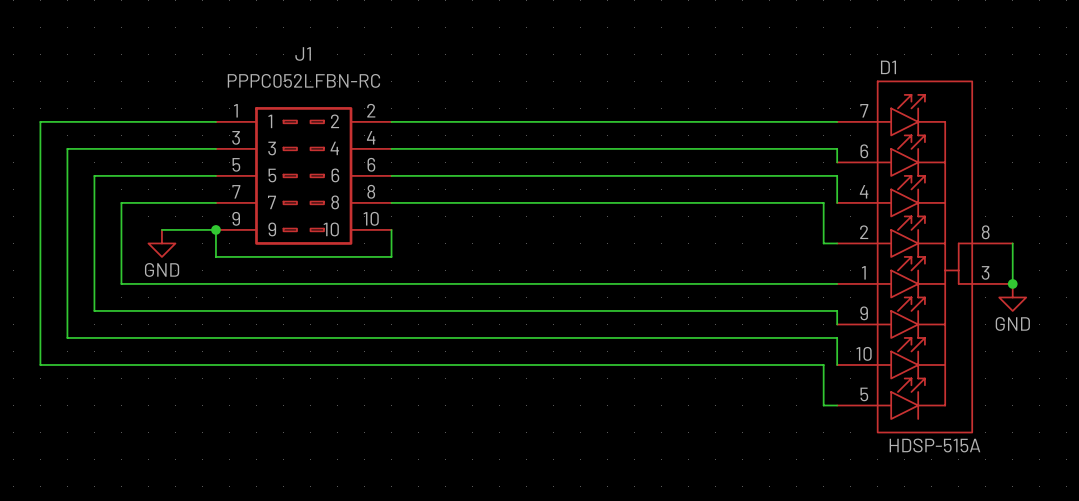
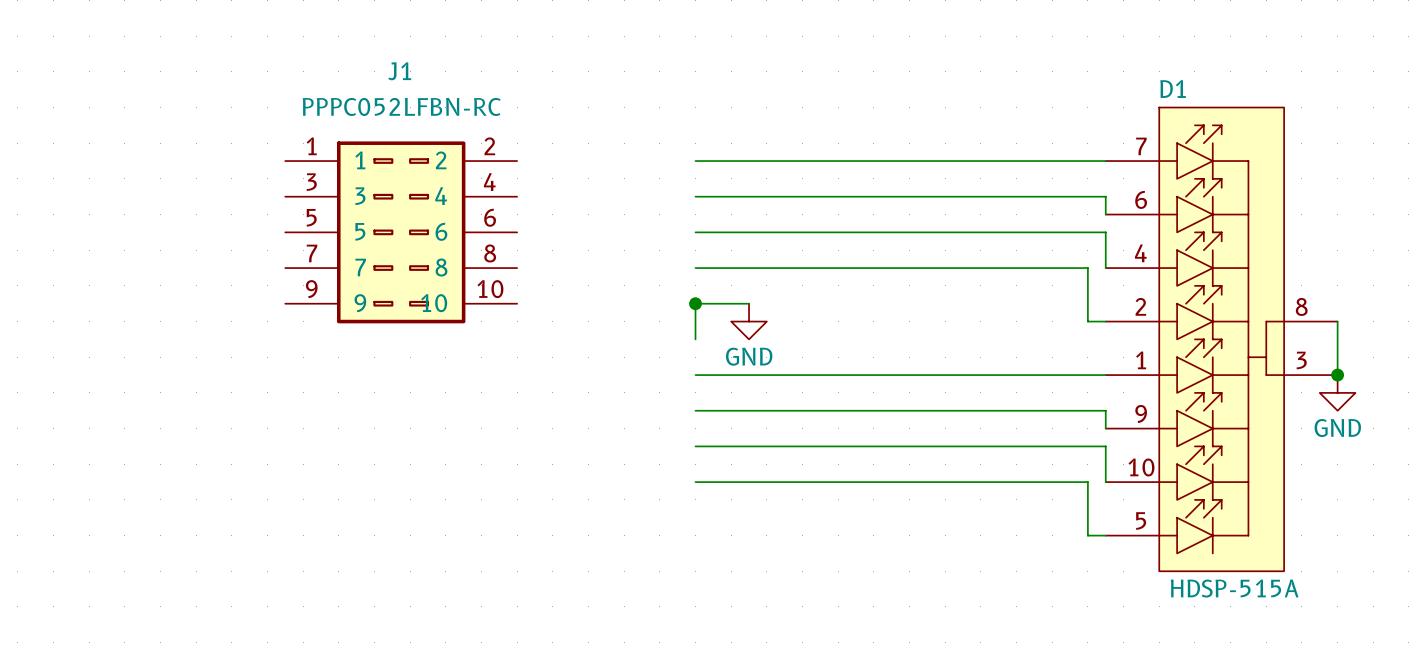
wire: (215, 121) (40, 121) (40, 364) (526, 364) -> none
wire: (391, 121) (526, 121) -> none
wire: (215, 148) (67, 148) (67, 337) (526, 337) -> none
wire: (391, 148) (526, 148) -> none
wire: (215, 175) (94, 175) (94, 310) (526, 310) -> none
wire: (391, 175) (526, 175) -> none
wire: (215, 202) (121, 202) (121, 283) (526, 283) -> none
wire: (391, 202) (526, 202) -> none
wire: (161, 229) (215, 229) (215, 256) (391, 256) (391, 229) -> none
junction: (215, 229) -> none
junction: none -> (695, 303)
wire: none -> (749, 303) (695, 303) (695, 339)
power symbol: GND (161, 243) -> none
power symbol: none -> GND (749, 321)

